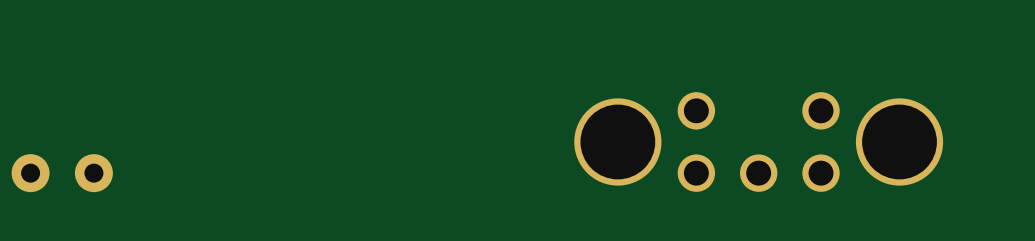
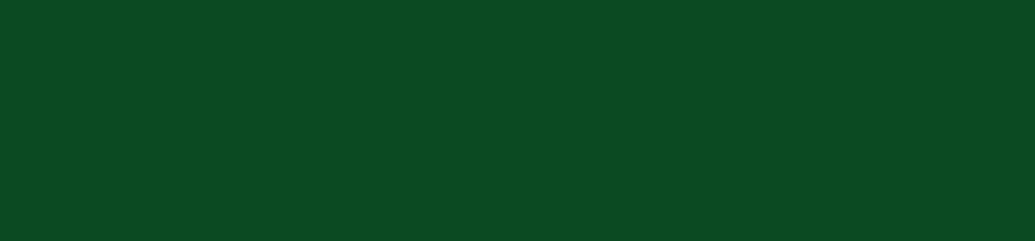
part: (758, 141) -> none
part: (62, 173) -> none

